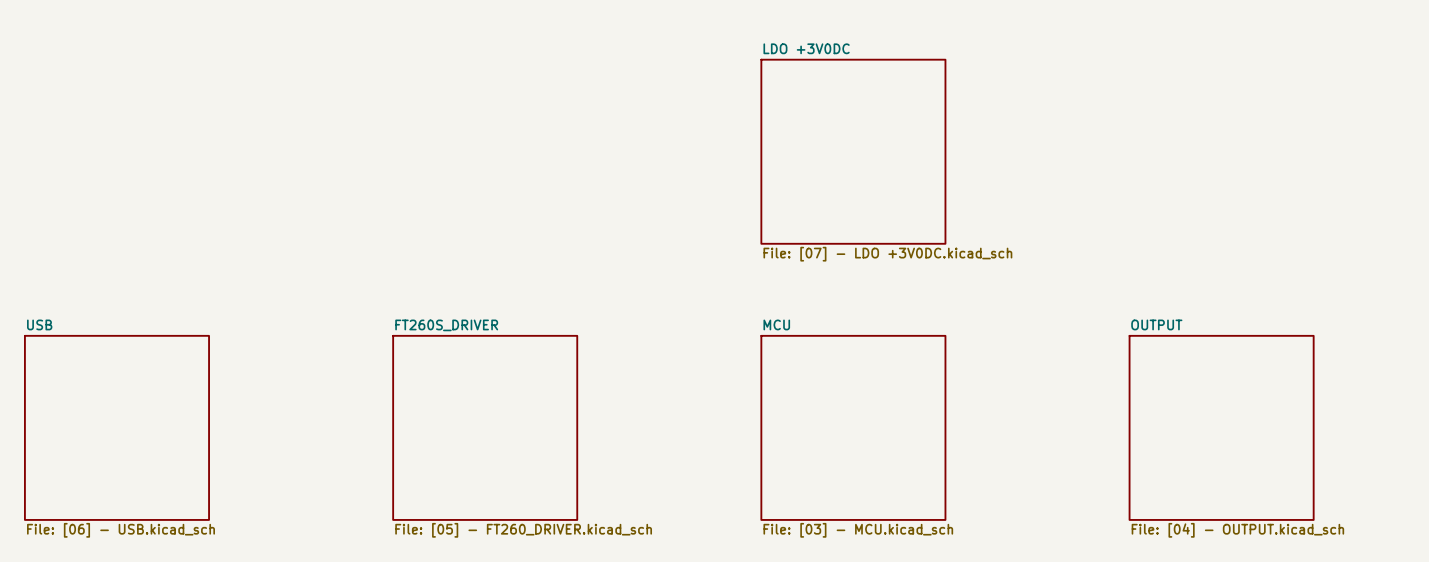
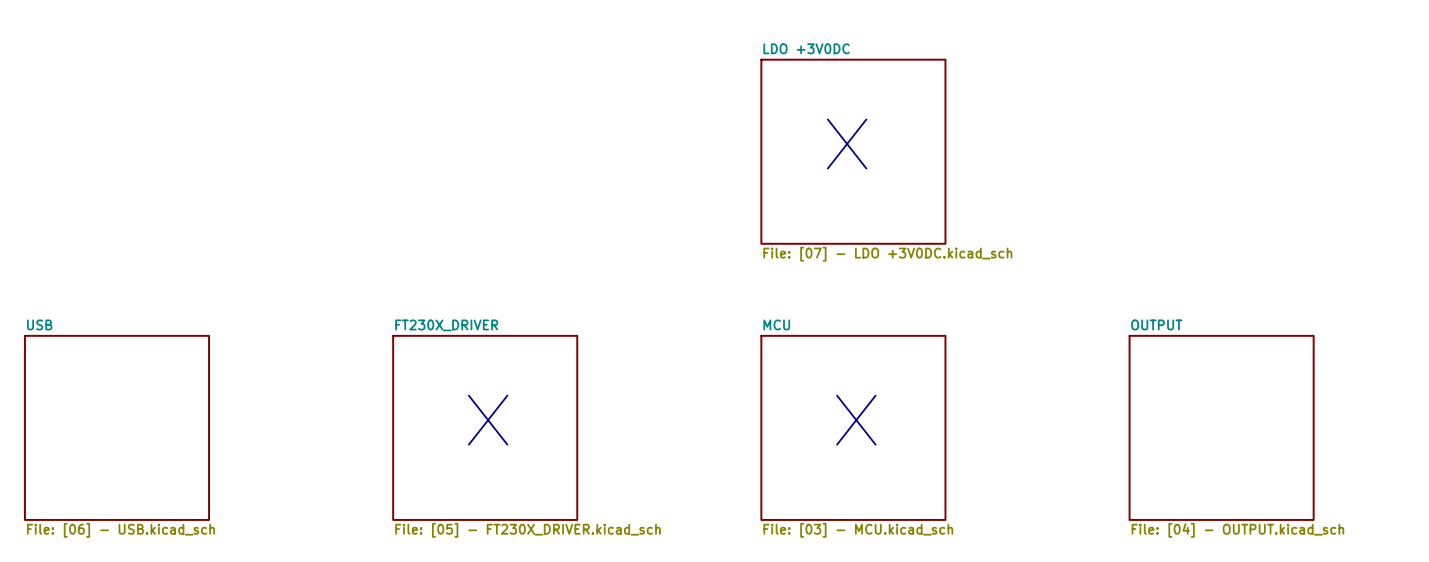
text: none -> x (847, 143)
sheet FT260S_DRIVER name: FT260S_DRIVER (446, 325) -> FT230X_DRIVER (446, 325)
text: none -> x (488, 420)
text: none -> x (856, 420)
sheet FT260S_DRIVER value: File: [05] - FT260_DRIVER.kicad_sch (523, 530) -> File: [05] - FT230X_DRIVER.kicad_sch (528, 530)

